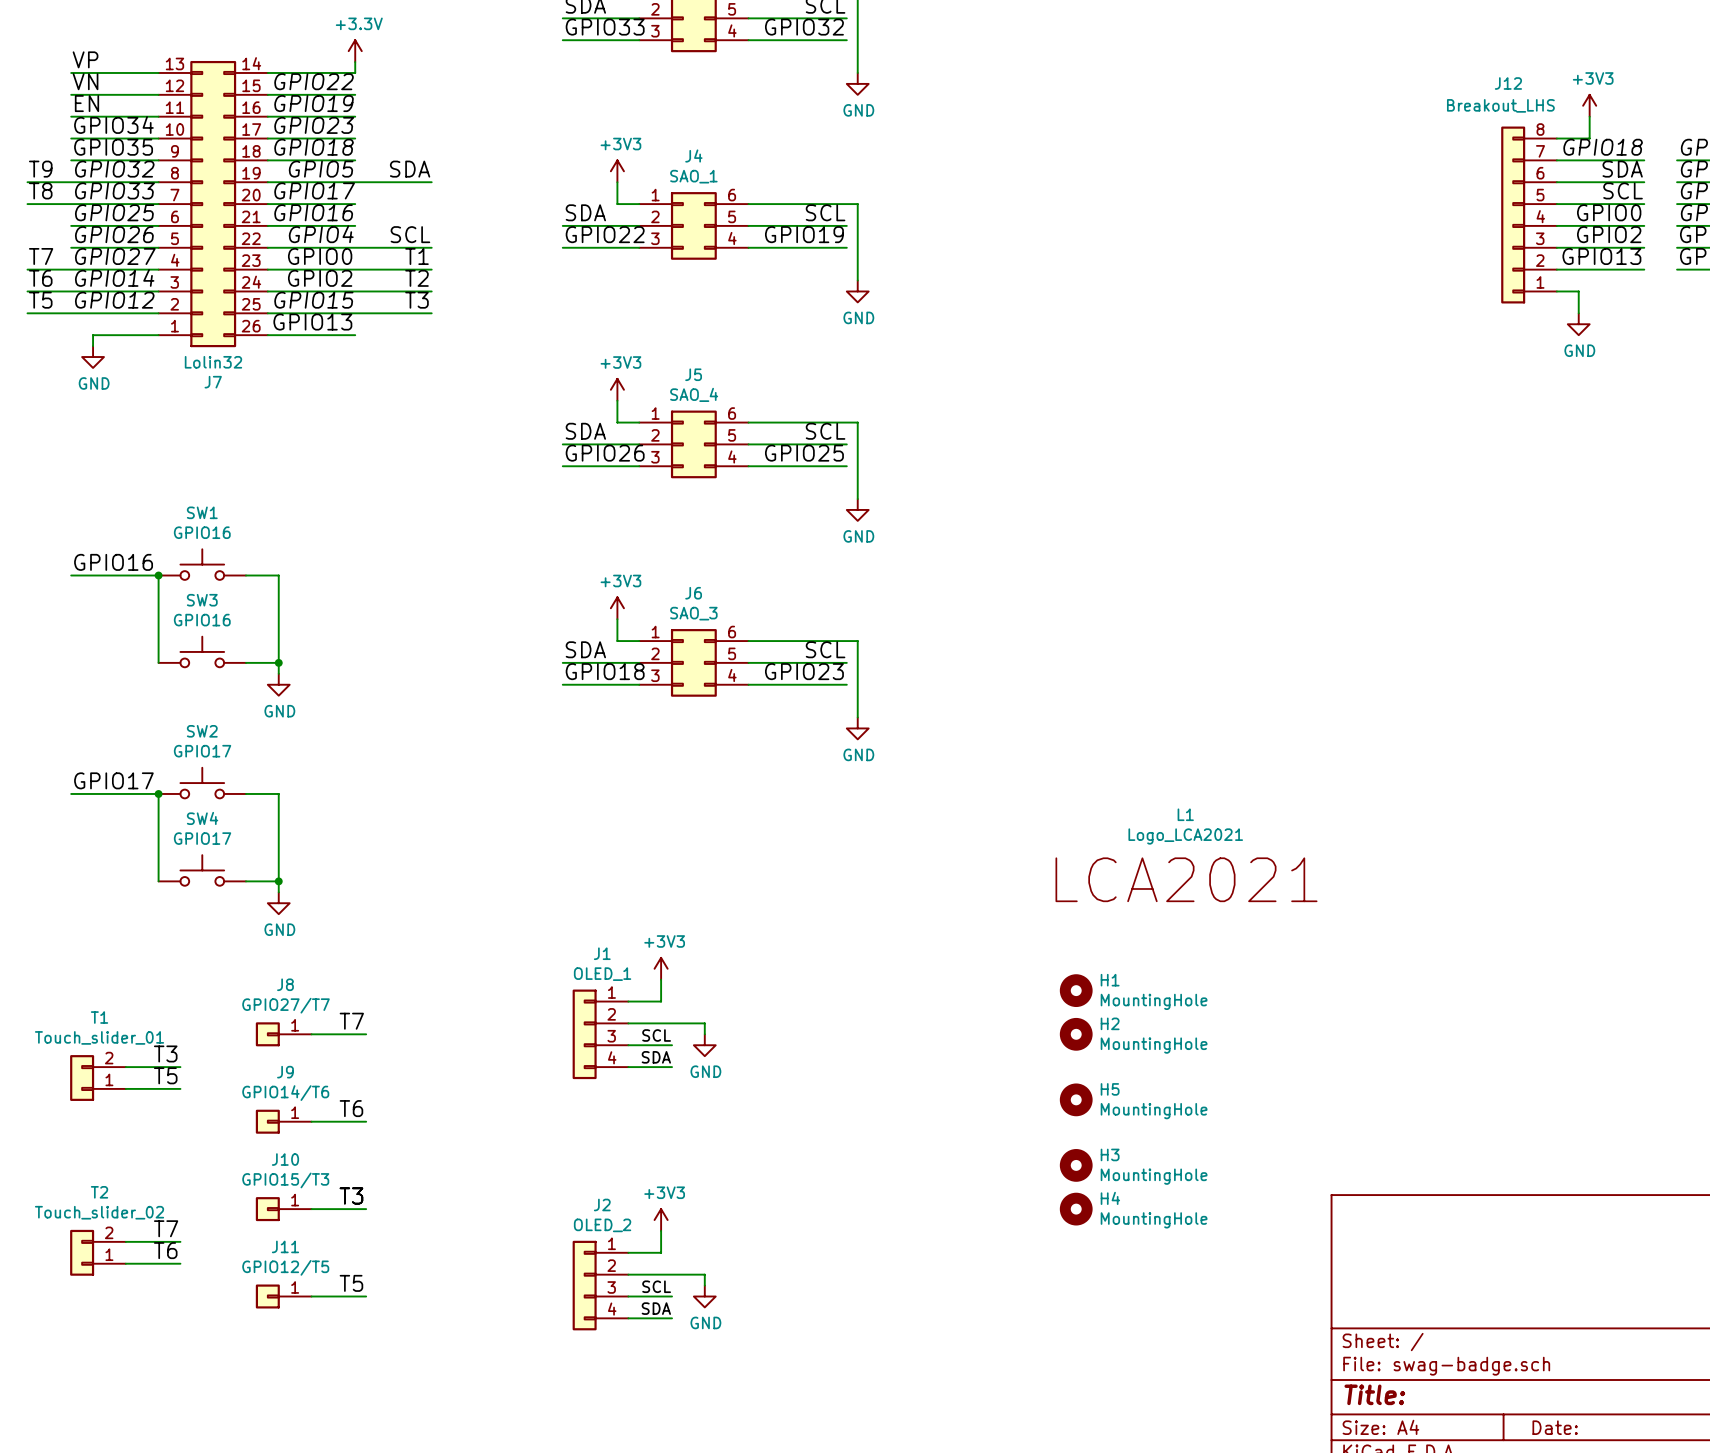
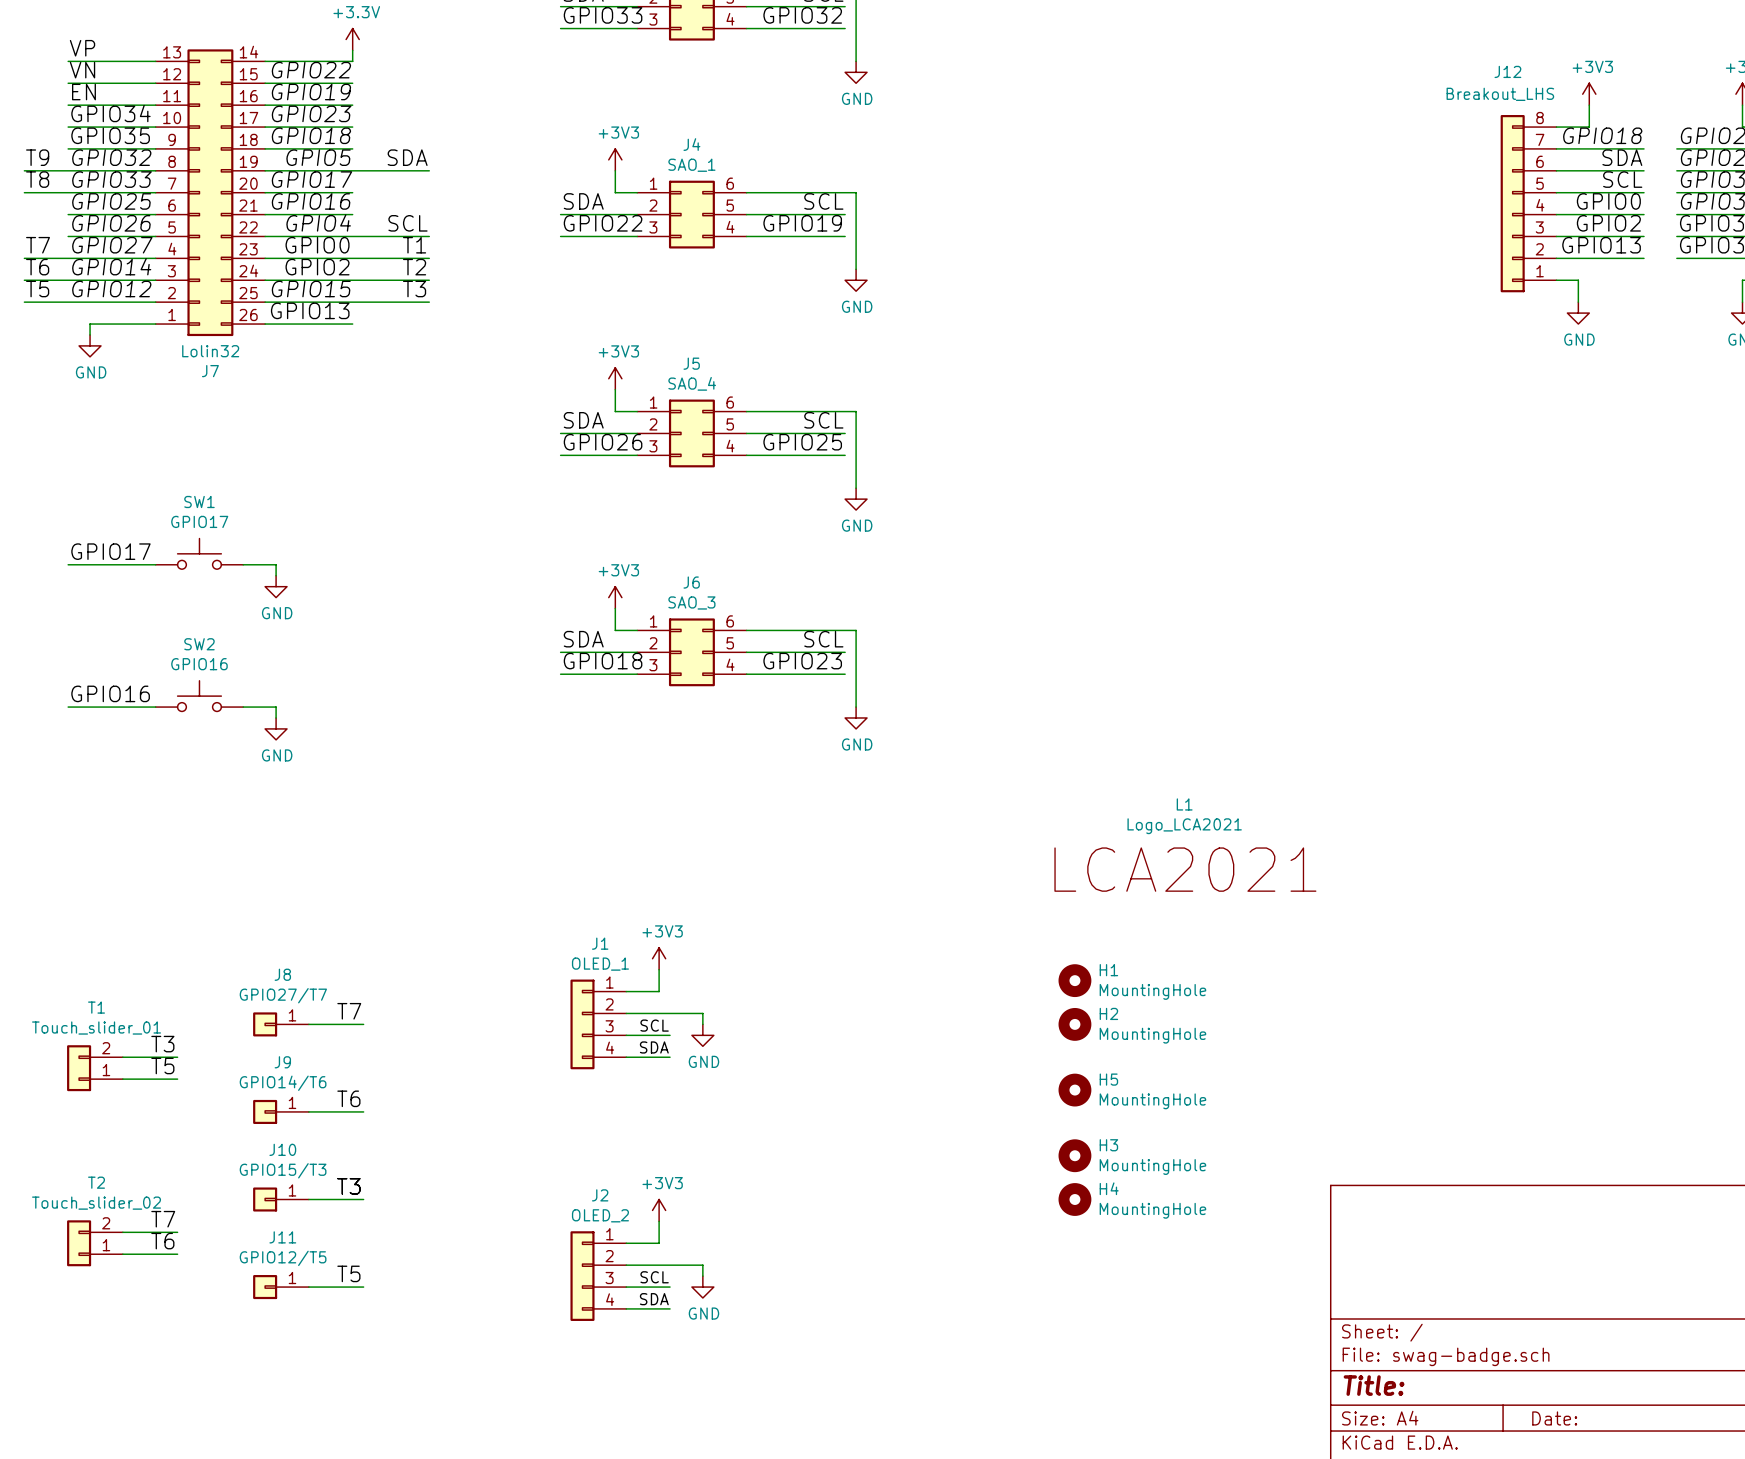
SW1 value: GPIO16 (202, 532) -> GPIO17 (199, 521)
label: GPIO16 (113, 562) -> GPIO17 (110, 551)
wire: (158, 575) (158, 662) -> none
junction: (158, 575) -> none
wire: (278, 586) (278, 673) -> none
power symbol: none -> GND (276, 586)
SW3: GPIO16 (202, 651) -> none
wire: (245, 662) (278, 662) -> none
junction: (278, 662) -> none
power symbol: GND (278, 684) -> none
label: none -> GPIO16 (110, 693)
wire: none -> (68, 707) (155, 707)
wire: none -> (243, 707) (276, 707) (276, 717)
power symbol: none -> GND (276, 728)
SW2 value: GPIO17 (202, 751) -> GPIO16 (199, 664)
label: GPIO17 (113, 780) -> none
SW2 position: (202, 783) -> (199, 696)
wire: (71, 793) (158, 793) (158, 881) -> none
junction: (158, 793) -> none
wire: (245, 793) (278, 793) (278, 892) -> none
SW4: GPIO17 (202, 870) -> none
wire: (245, 881) (278, 881) -> none
junction: (278, 881) -> none
power symbol: GND (278, 903) -> none

